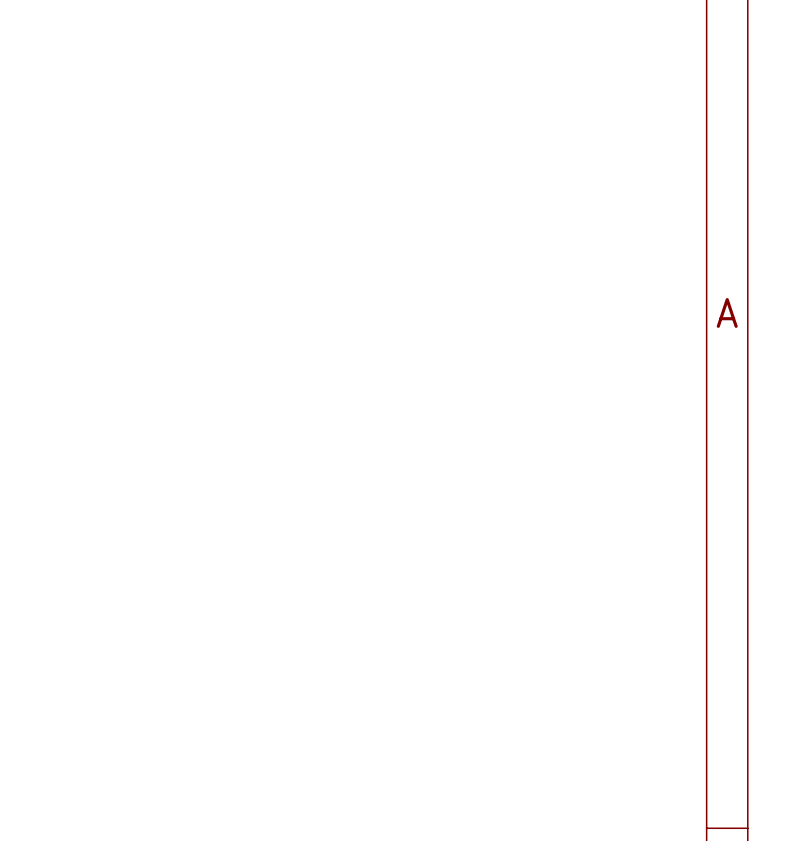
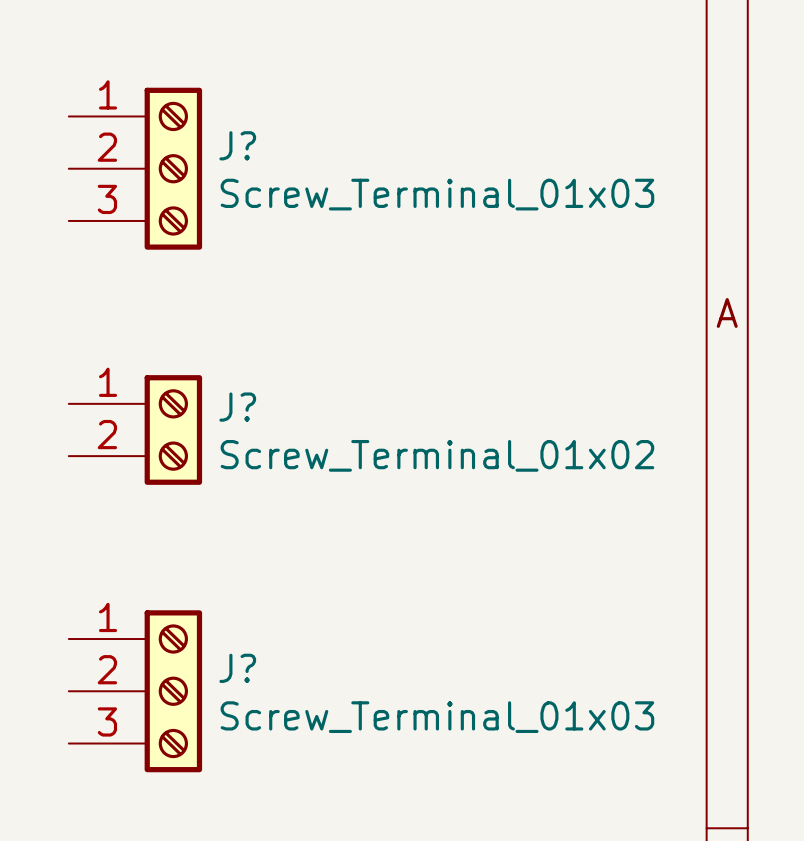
J?: none -> Screw_Terminal_01x03 (135, 168)
J?: none -> Screw_Terminal_01x02 (135, 429)
J?: none -> Screw_Terminal_01x03 (135, 691)

